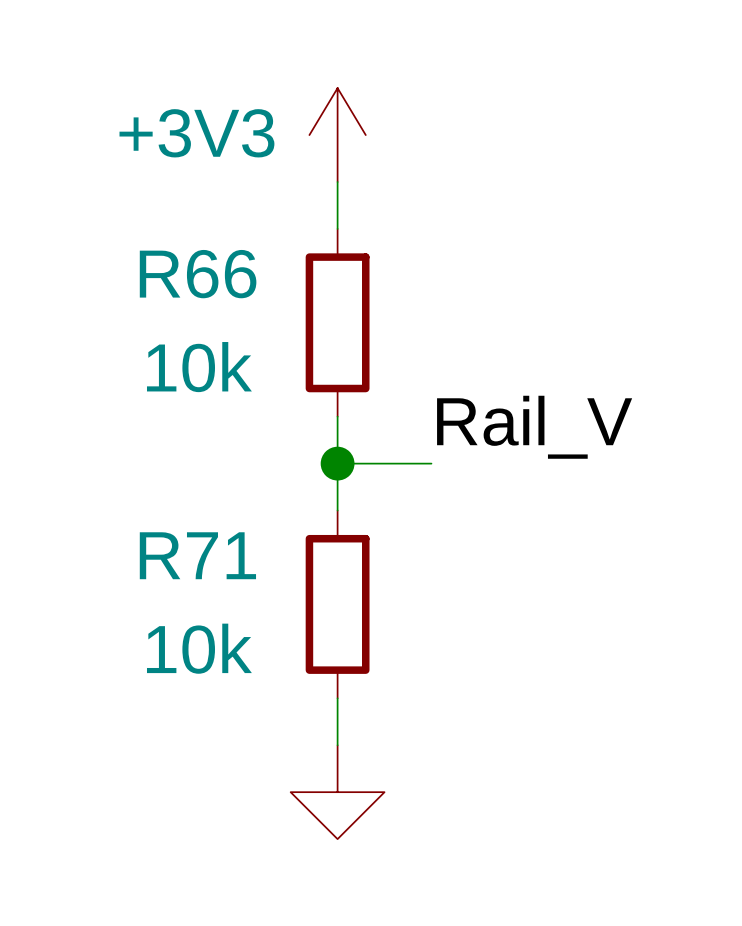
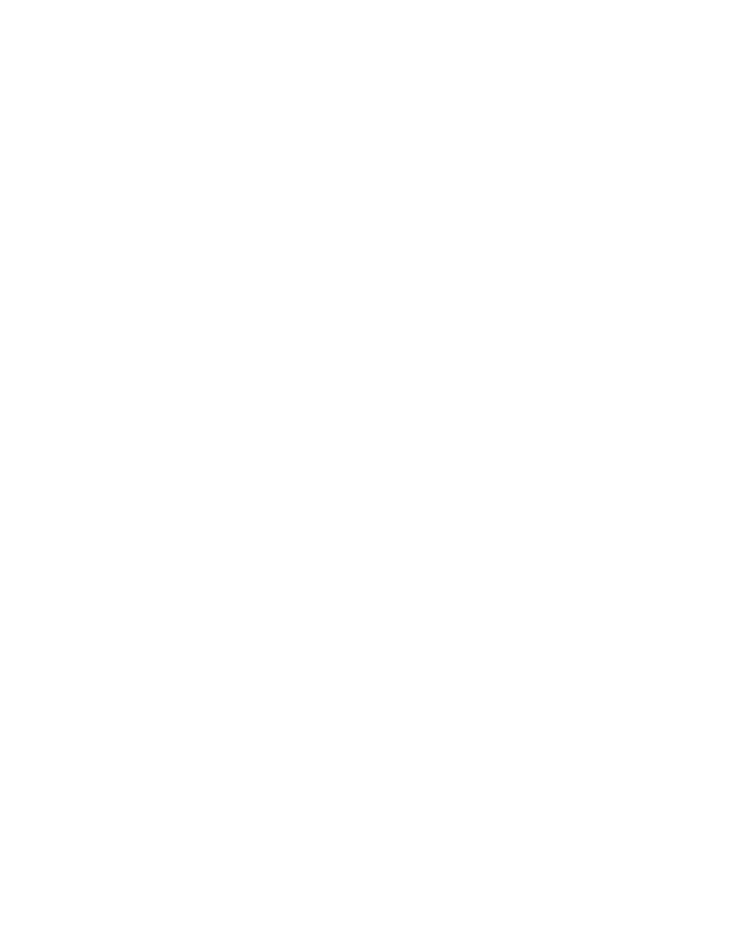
power symbol: +3V3 (337, 135) -> none
wire: (337, 182) (337, 228) -> none
R66: 10k (337, 322) -> none
wire: (337, 416) (337, 510) -> none
label: Rail_V (534, 427) -> none
wire: (337, 463) (431, 463) -> none
junction: (337, 463) -> none
R71: 10k (337, 604) -> none
wire: (337, 698) (337, 745) -> none
power symbol: (337, 792) -> none

